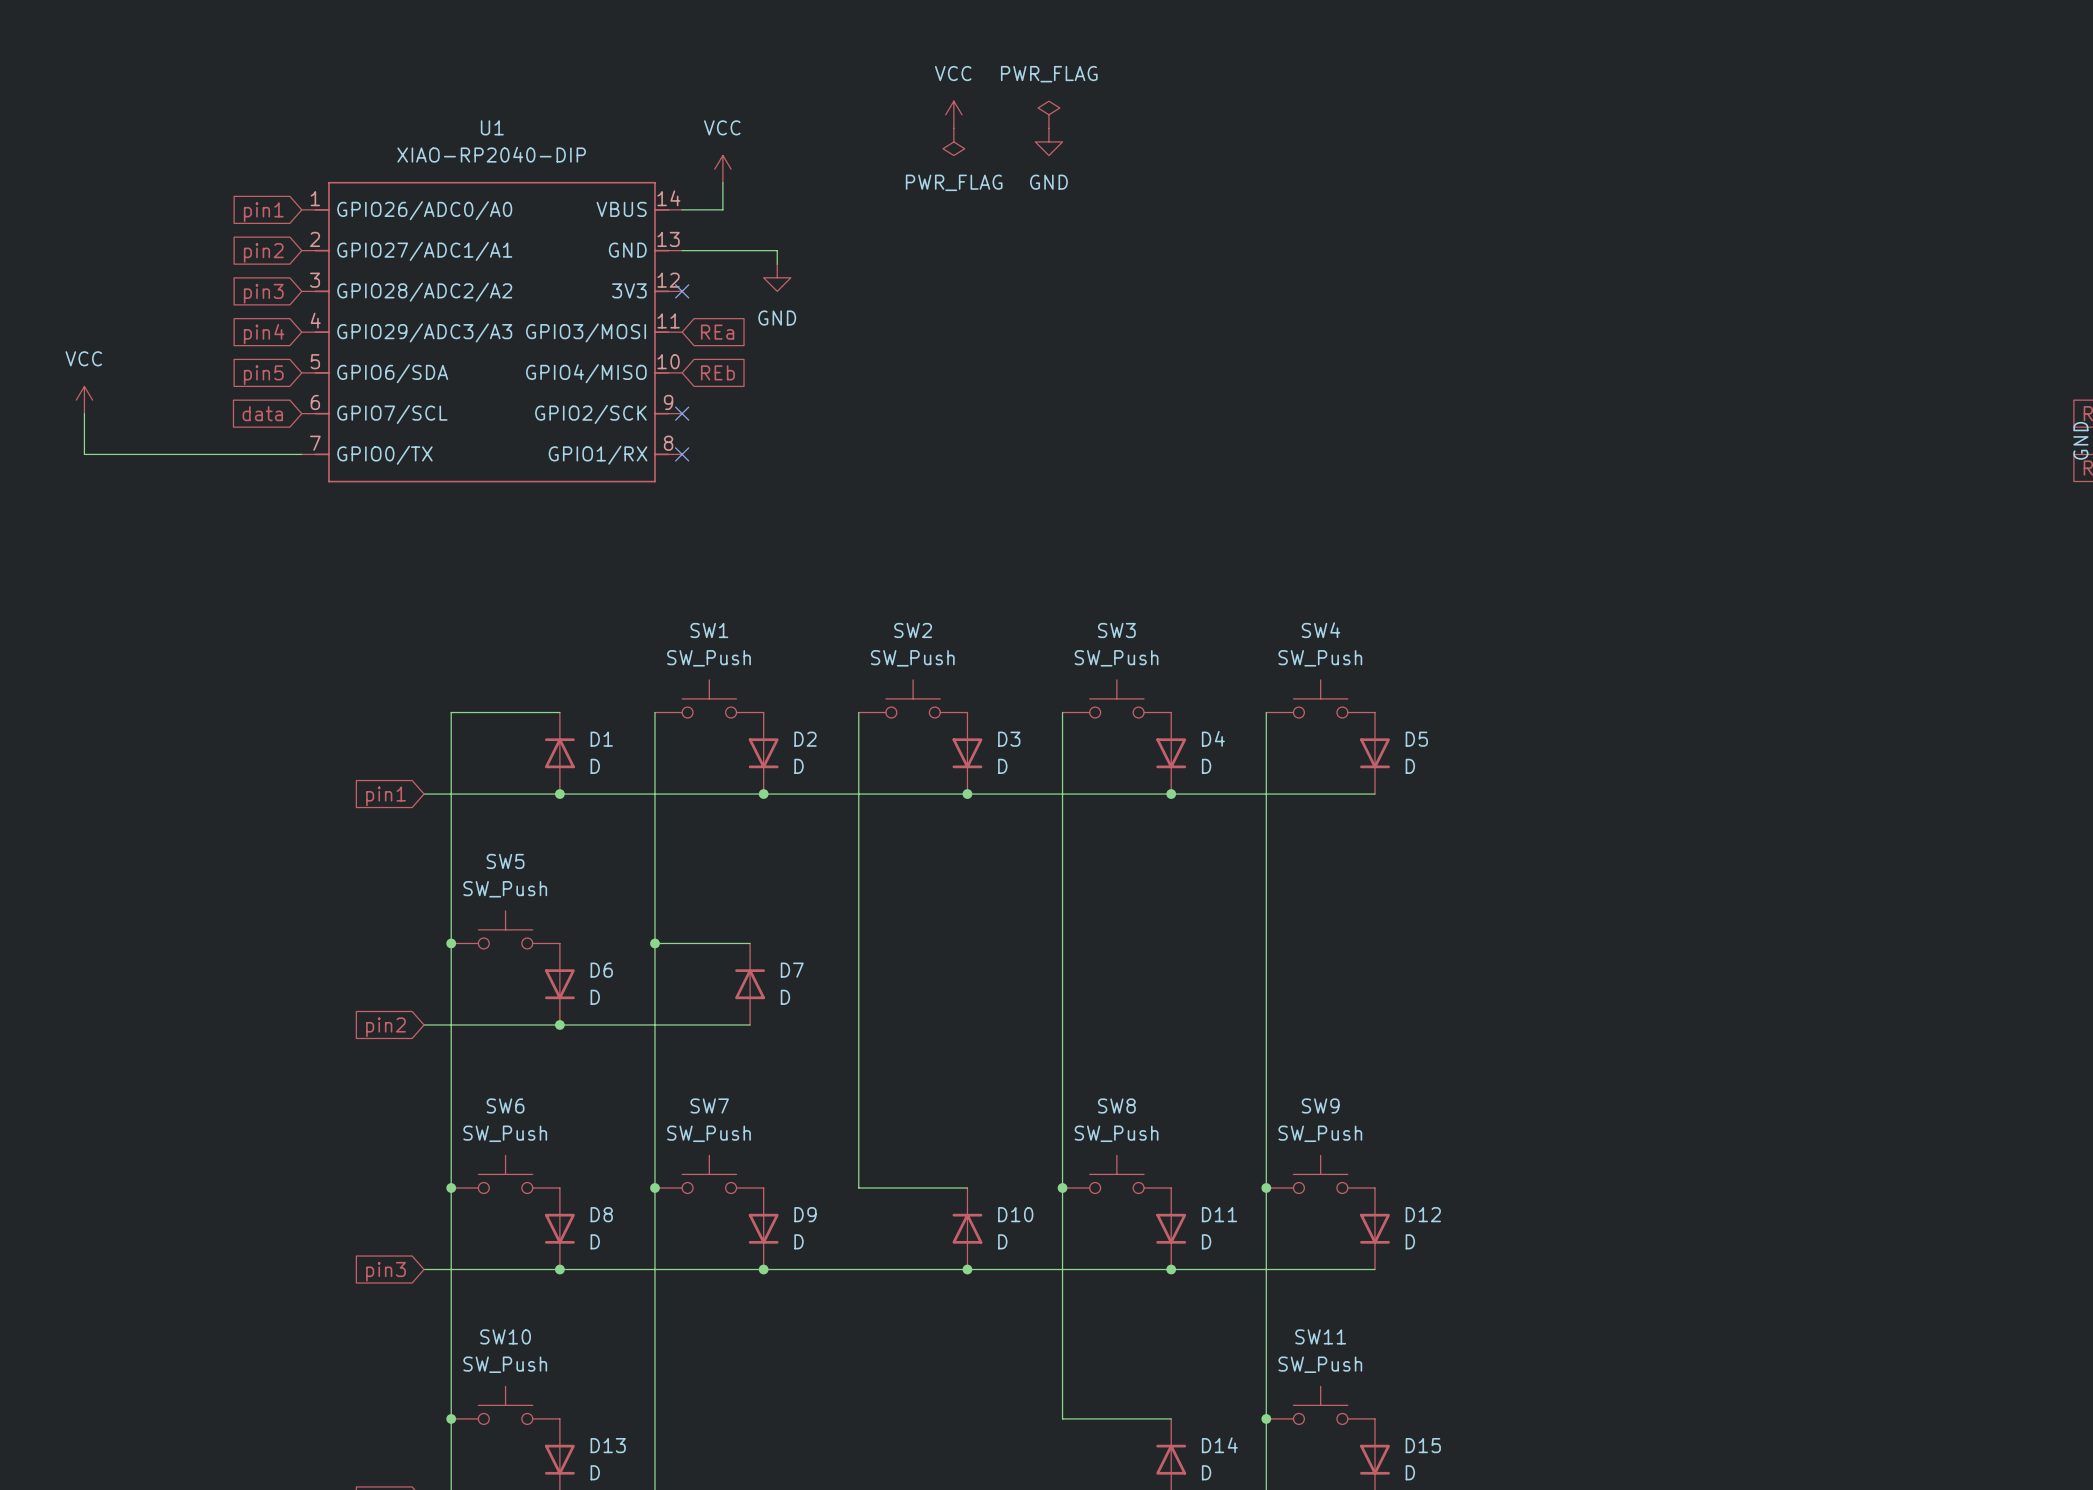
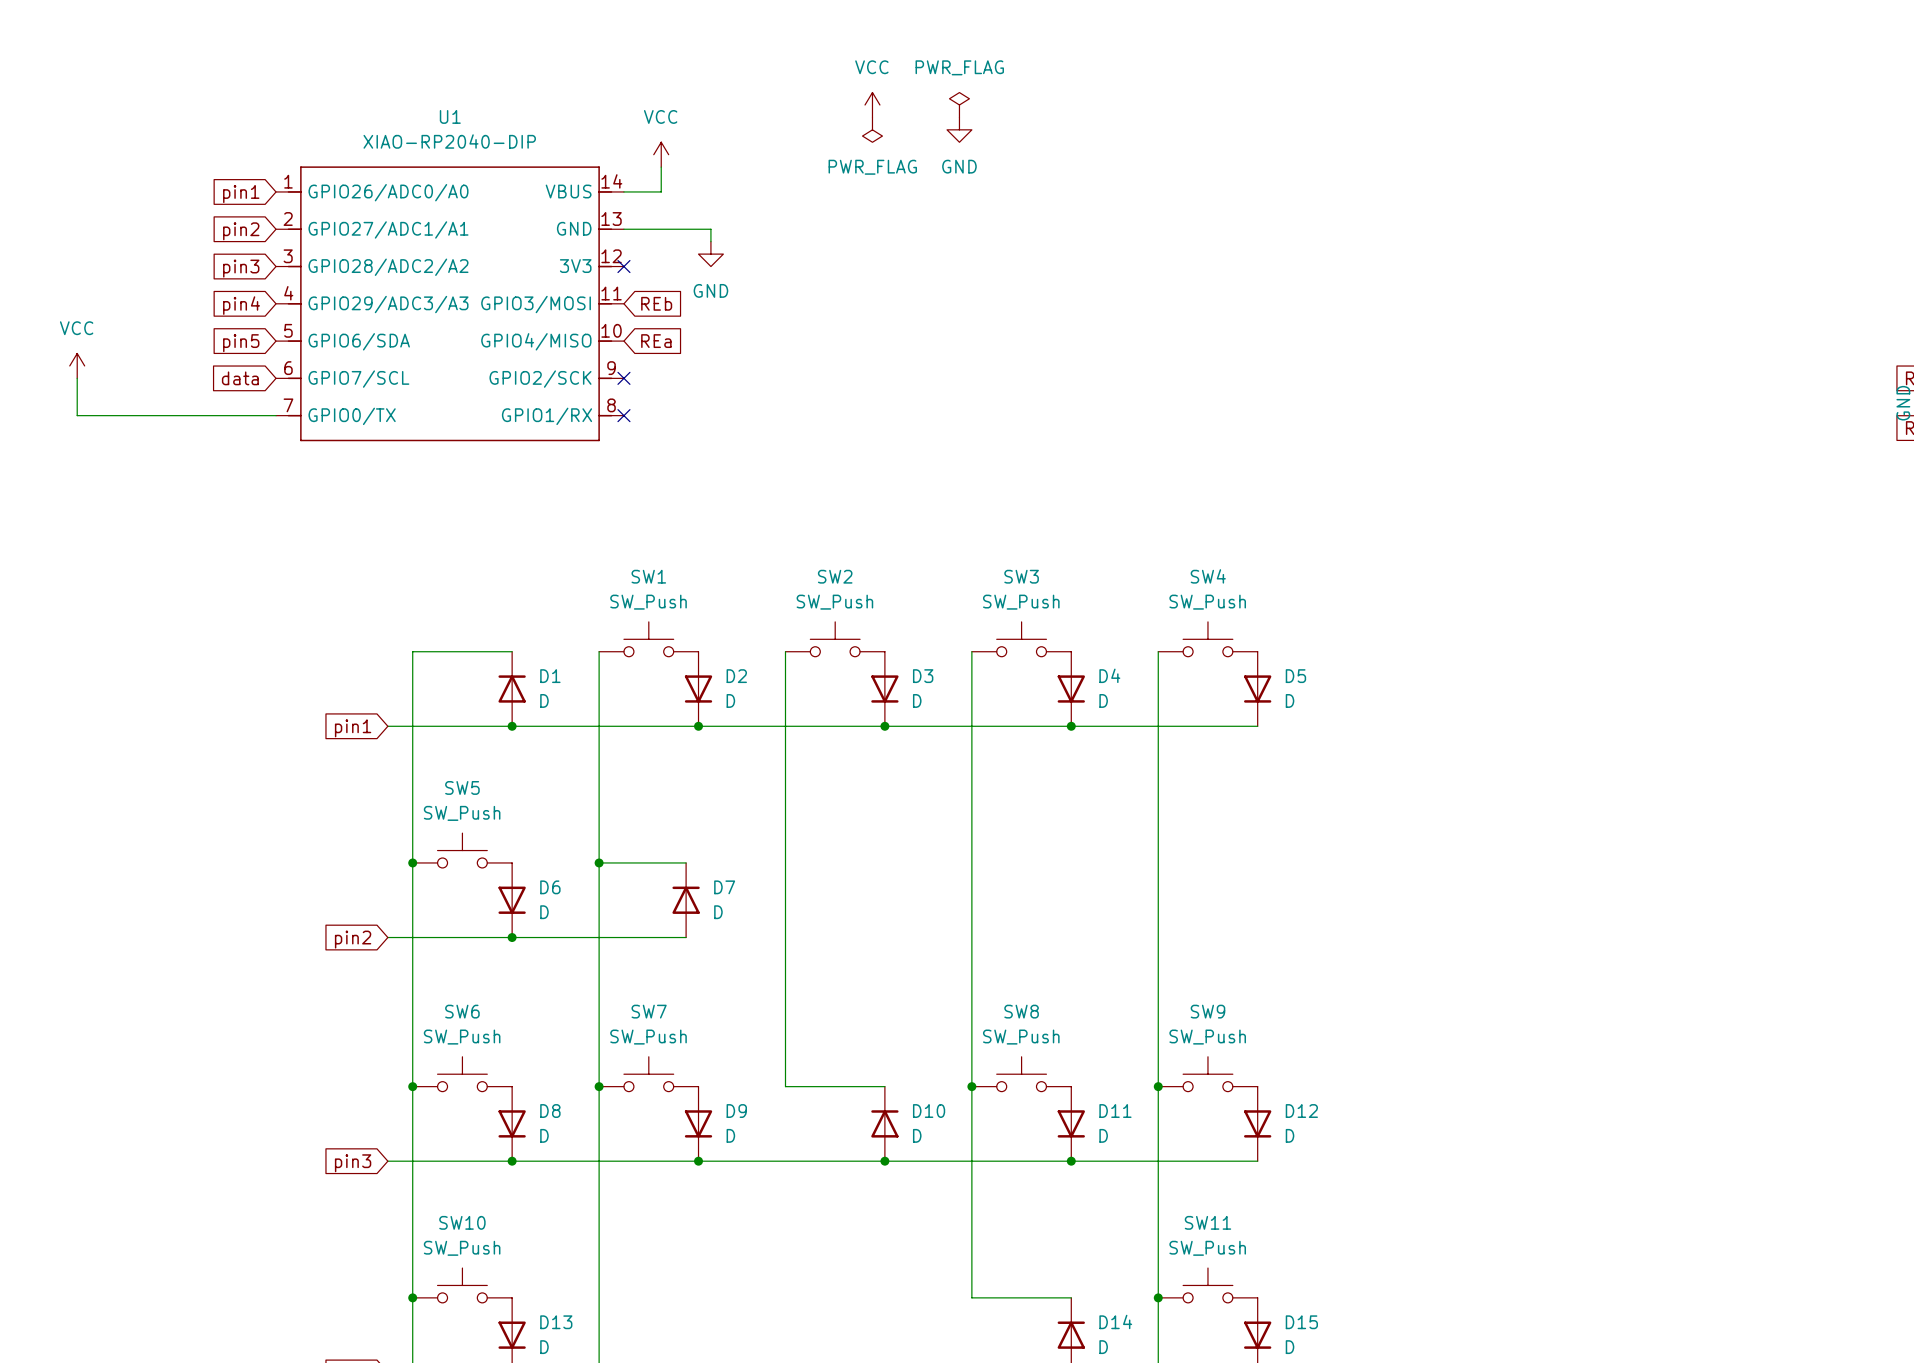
global label: REa (717, 332) -> REb (656, 303)
global label: REb (717, 372) -> REa (656, 341)

